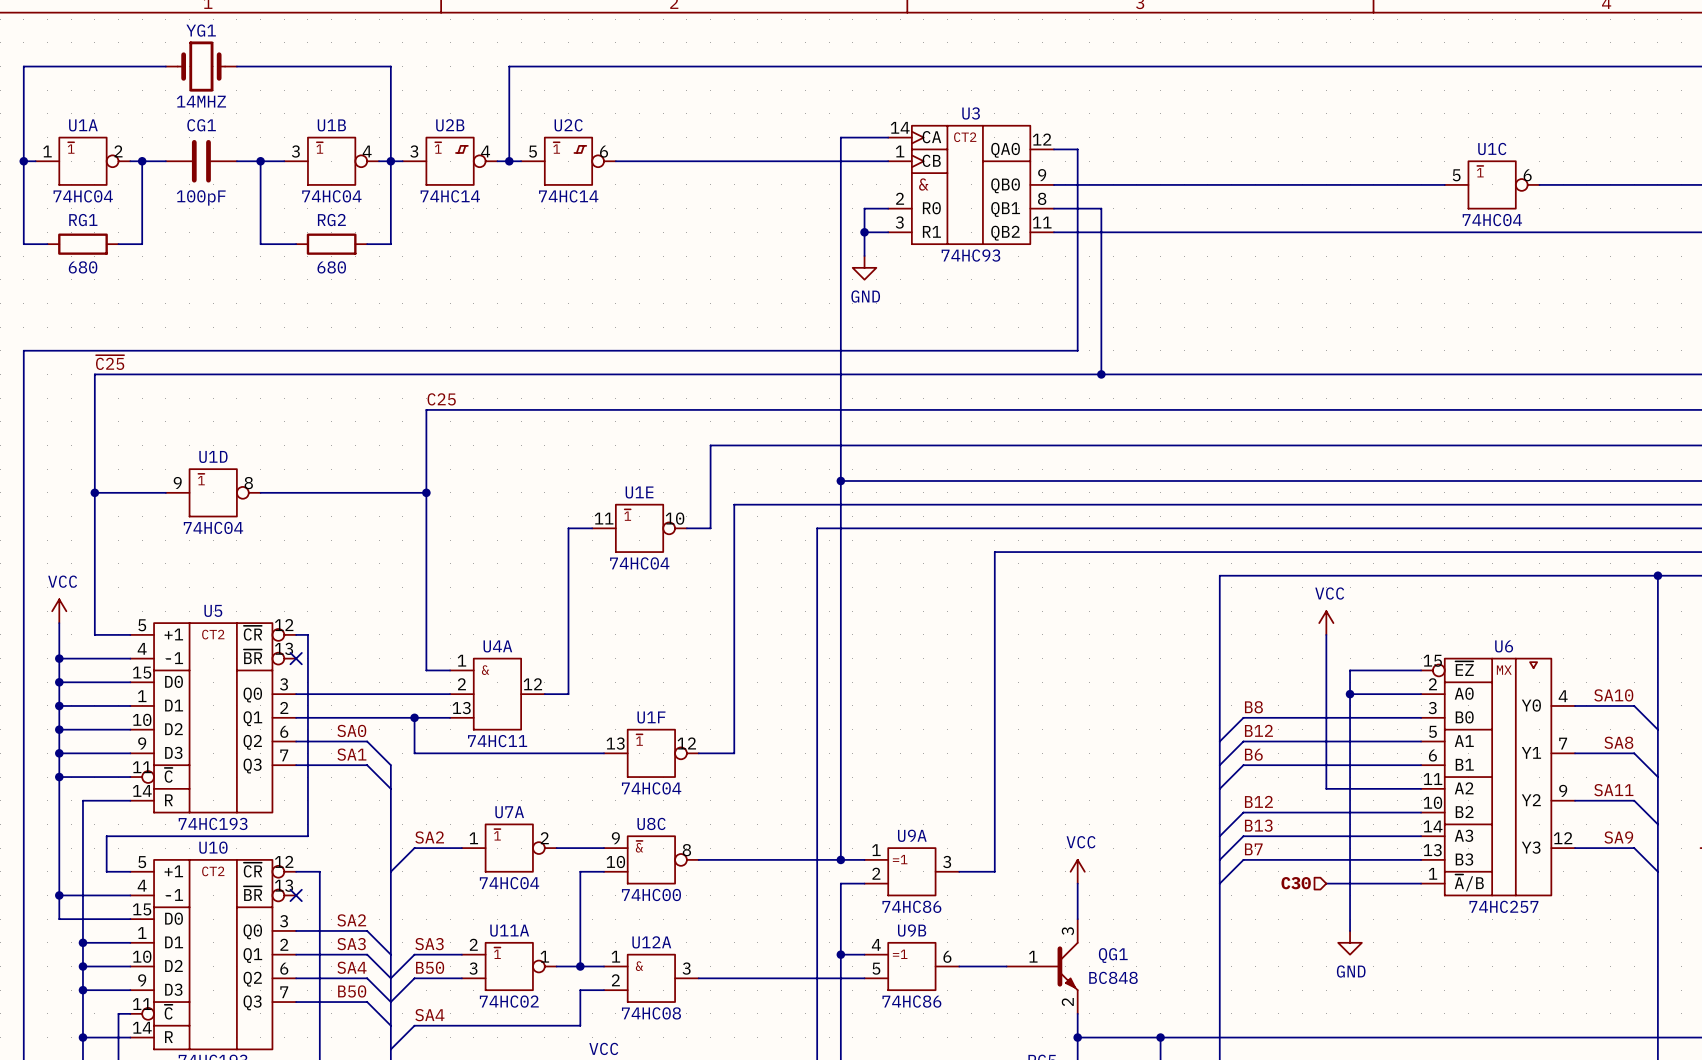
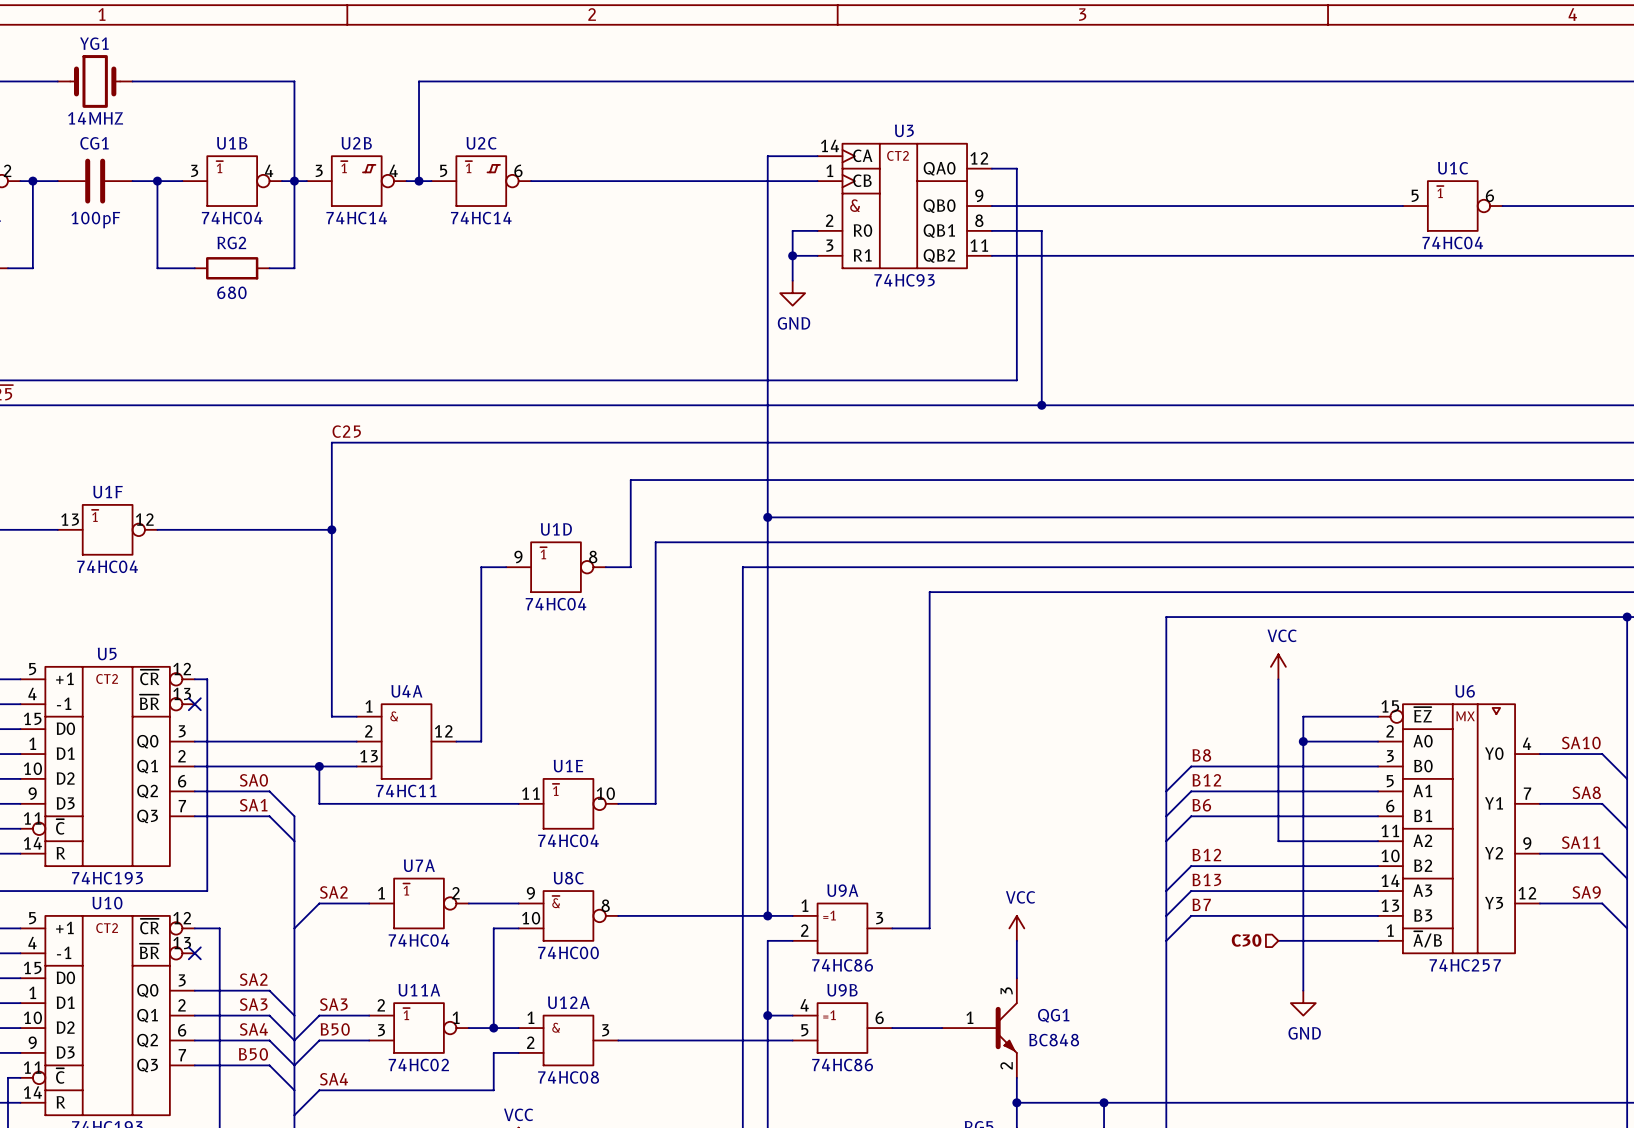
U1D position: (213, 492) -> (556, 567)
U1E position: (639, 528) -> (568, 803)
U1F position: (651, 753) -> (107, 529)

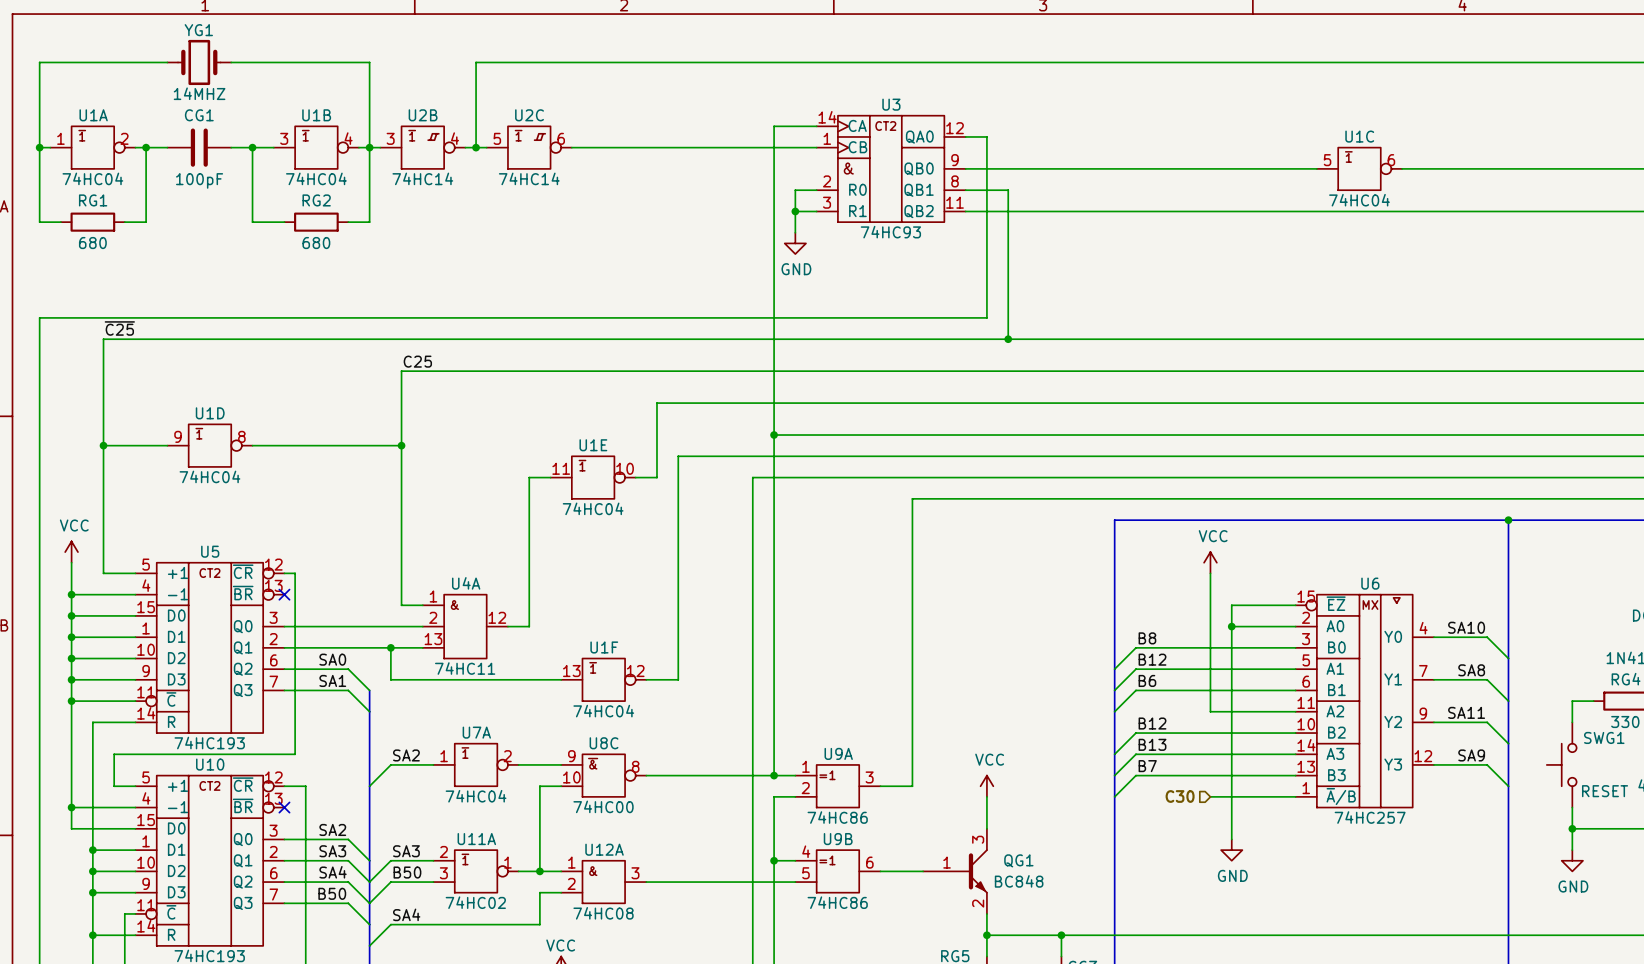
U1F position: (107, 529) -> (603, 679)
U1D position: (556, 567) -> (209, 445)
U1E position: (568, 803) -> (593, 477)

